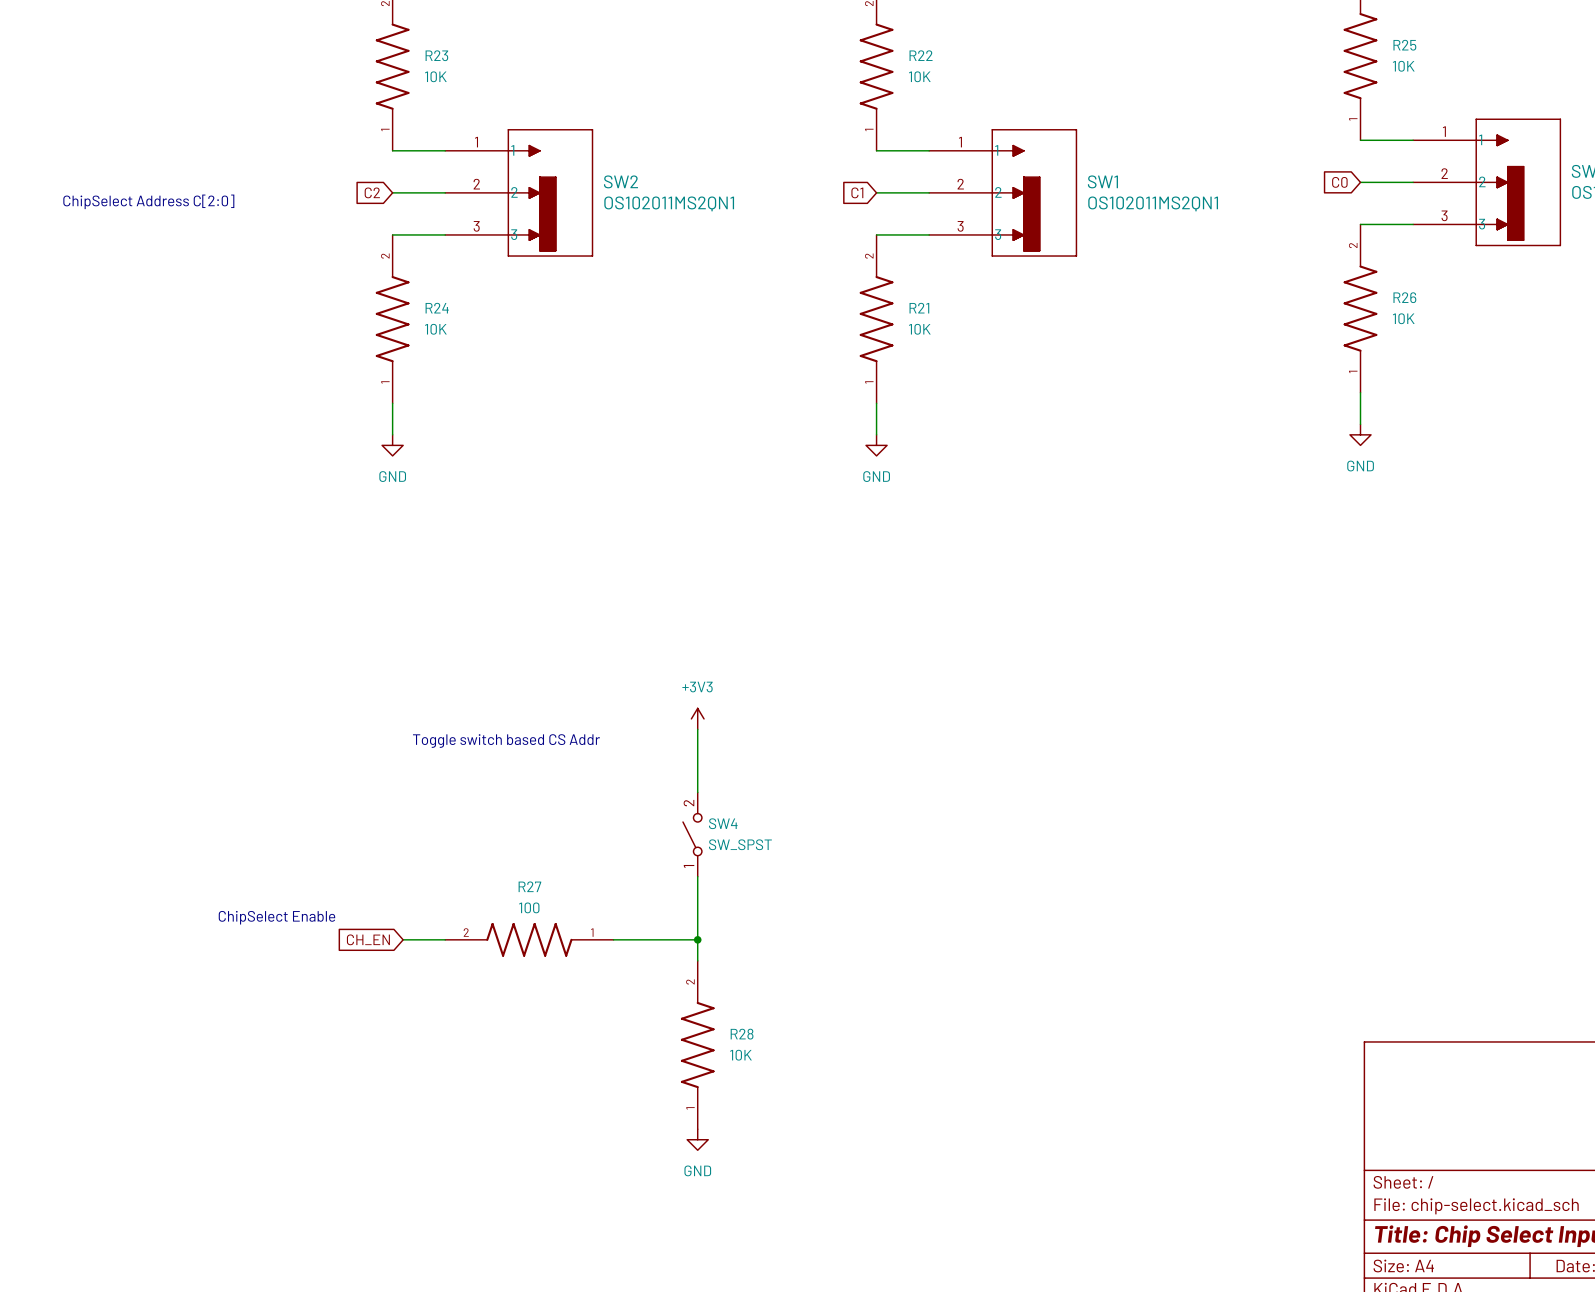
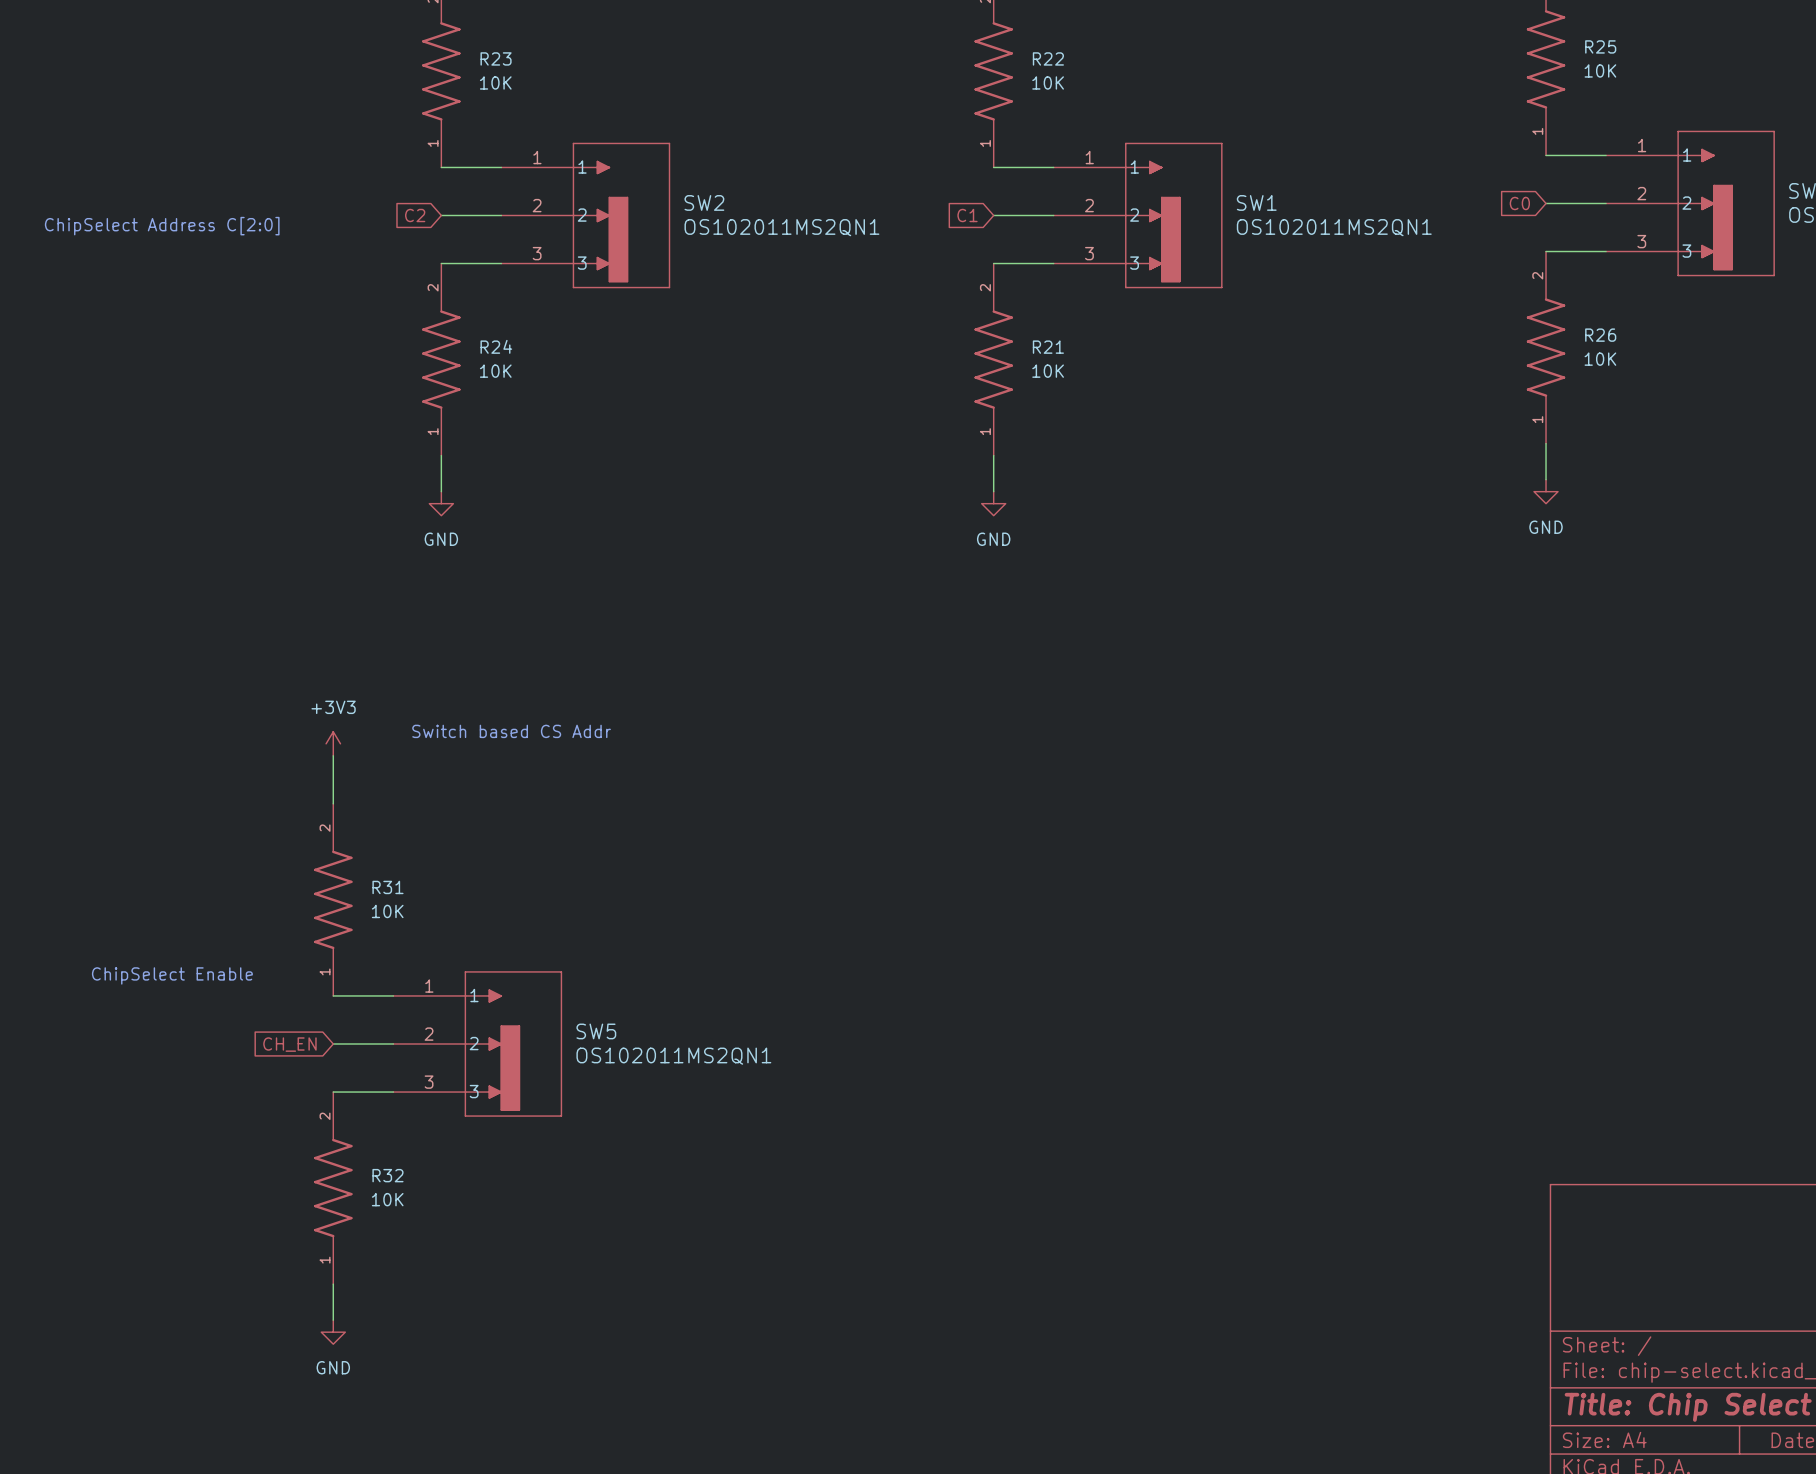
text: none -> Switch based CS Addr (511, 731)
power symbol: none -> +3V3 (333, 743)
wire: none -> (333, 755) (333, 803)
power symbol: +3V3 (697, 718) -> none
wire: (697, 729) (697, 792) -> none
text: Toggle switch based CS Addr (506, 741) -> none
R31: none -> 10K (333, 899)
SW4: SW_SPST (692, 834) -> none
wire: none -> (333, 995) (393, 995)
wire: (697, 876) (697, 960) -> none
text position: ChipSelect Enable (276, 917) -> ChipSelect Enable (172, 975)
wire: none -> (333, 1044) (393, 1044)
SW5: none -> OS102011MS2QN1 (477, 1044)
global label position: CH_EN (368, 939) -> CH_EN (289, 1044)
wire: (403, 939) (445, 939) -> none
R27: 100 (529, 939) -> none
wire: (613, 939) (697, 939) -> none
junction: (697, 939) -> none
wire: none -> (333, 1092) (393, 1092)
R32: none -> 10K (333, 1188)
R28: 10K (697, 1045) -> none
wire: none -> (333, 1284) (333, 1320)
power symbol: GND (697, 1139) -> none
power symbol: none -> GND (333, 1332)

